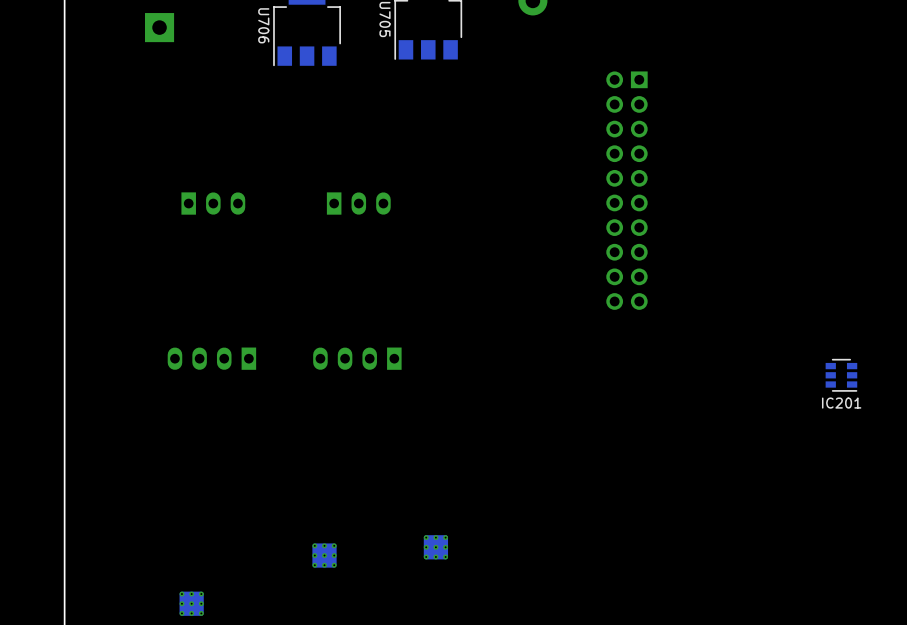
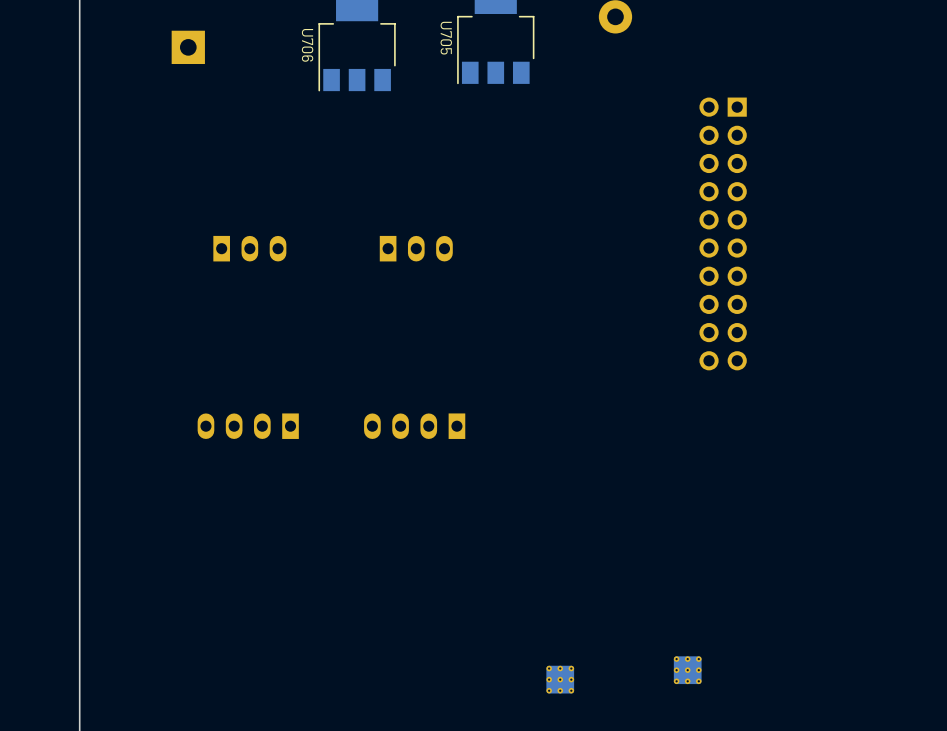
part: (435, 547) -> none
part: (324, 555) -> none
part: none -> (687, 670)
part: none -> (560, 679)
part: (191, 603) -> none

